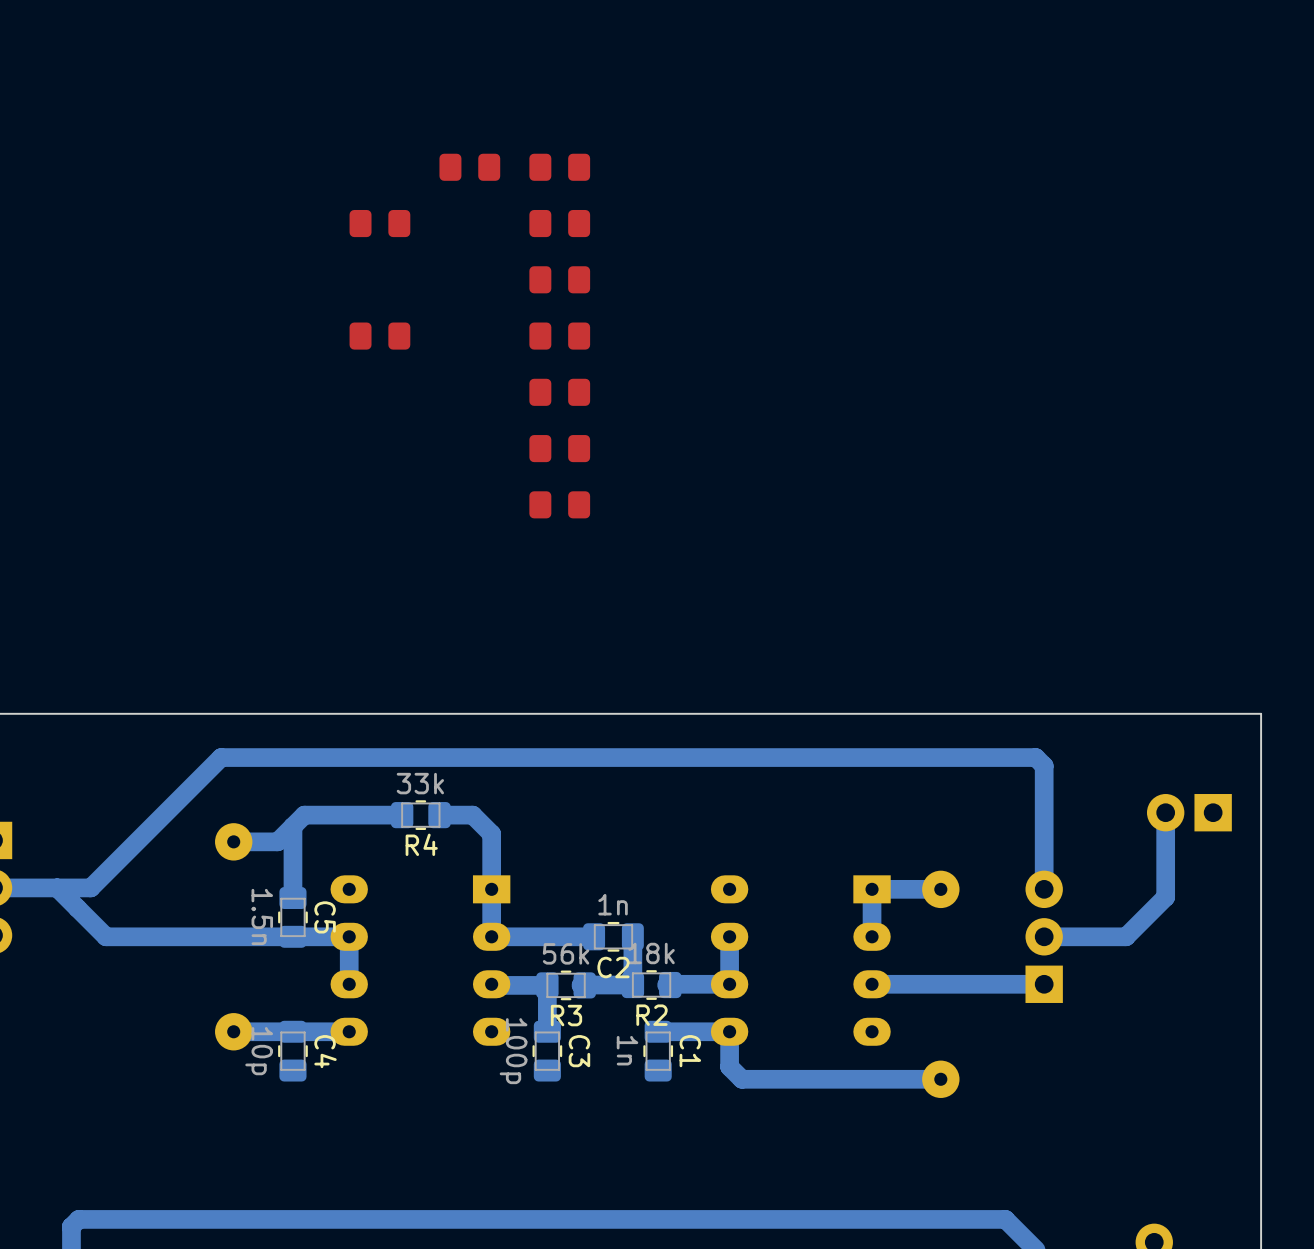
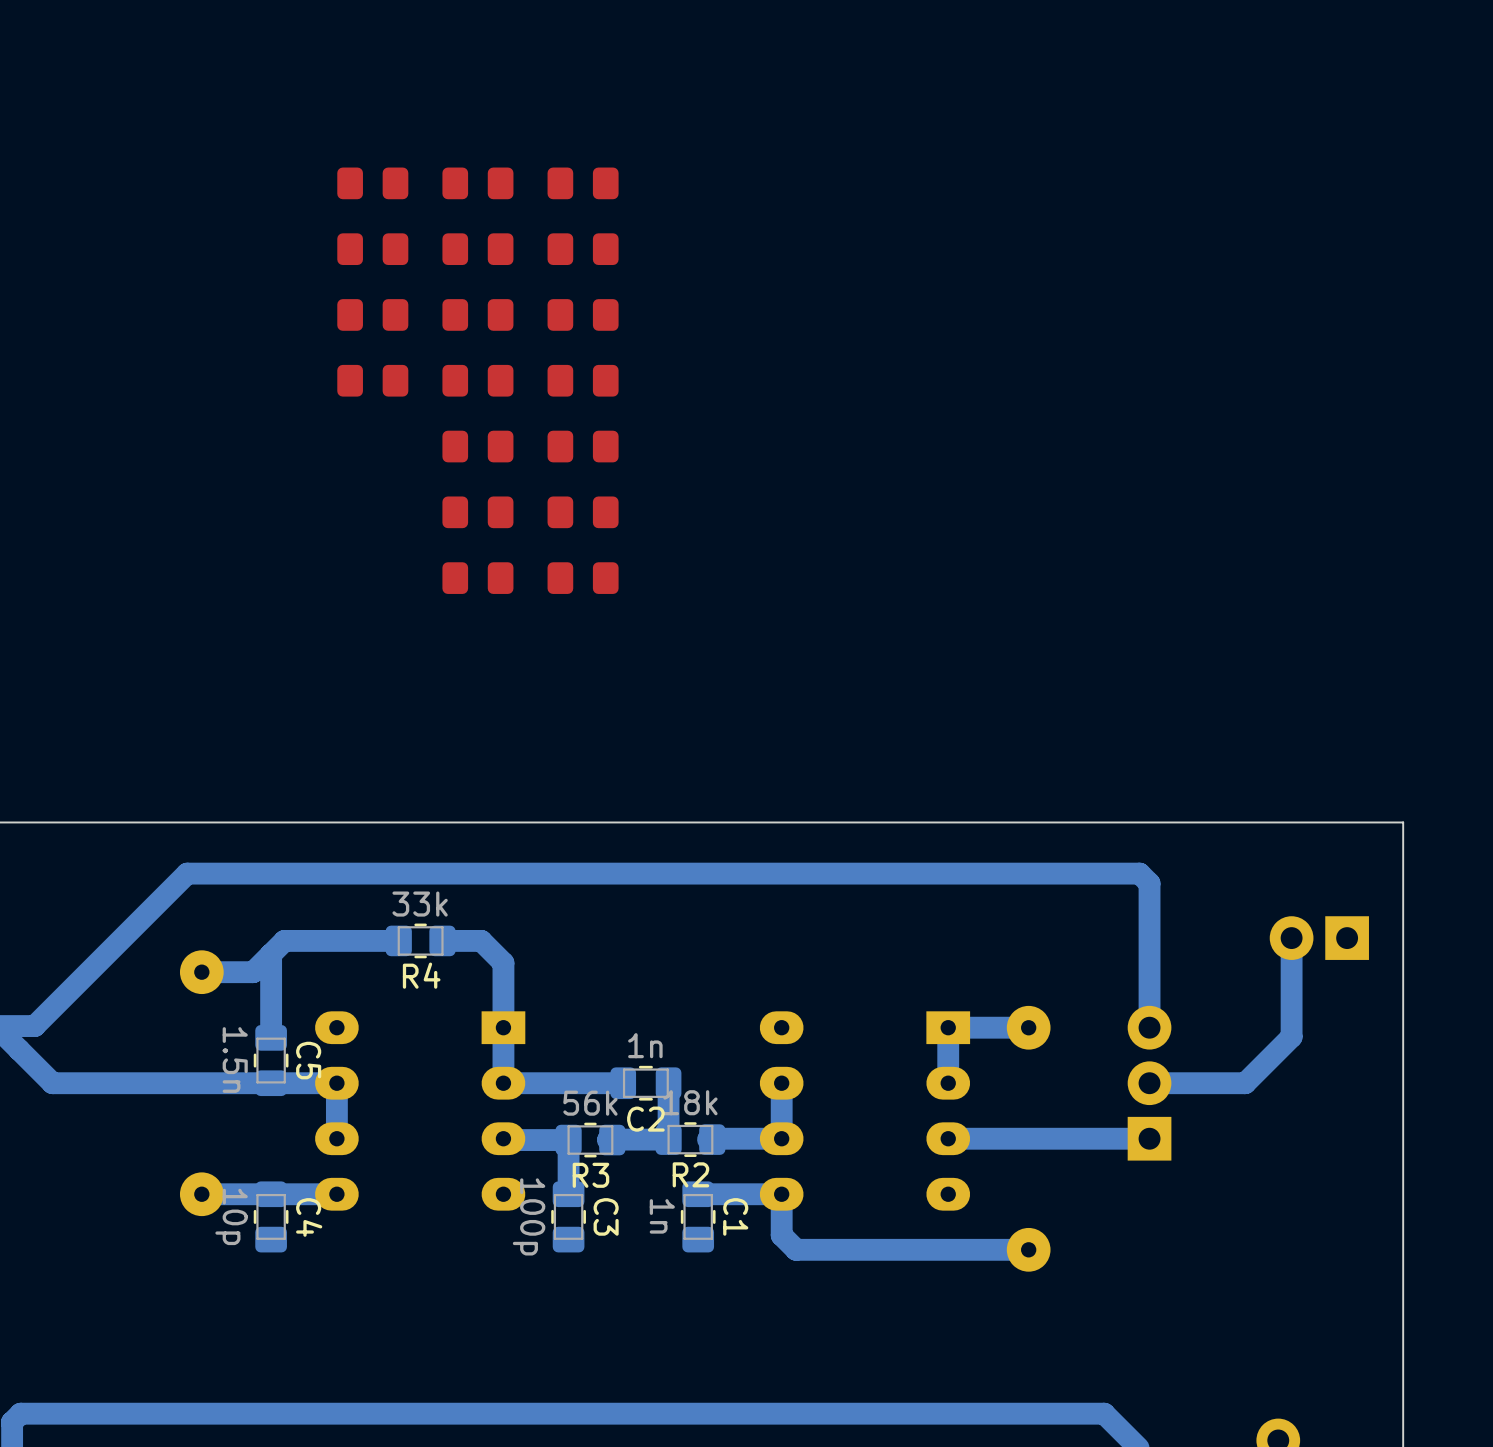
part: none -> (372, 183)
part: none -> (477, 249)
part: none -> (372, 314)
part: none -> (477, 314)
part: none -> (477, 380)
part: none -> (477, 446)
part: none -> (477, 512)
part: none -> (477, 578)

